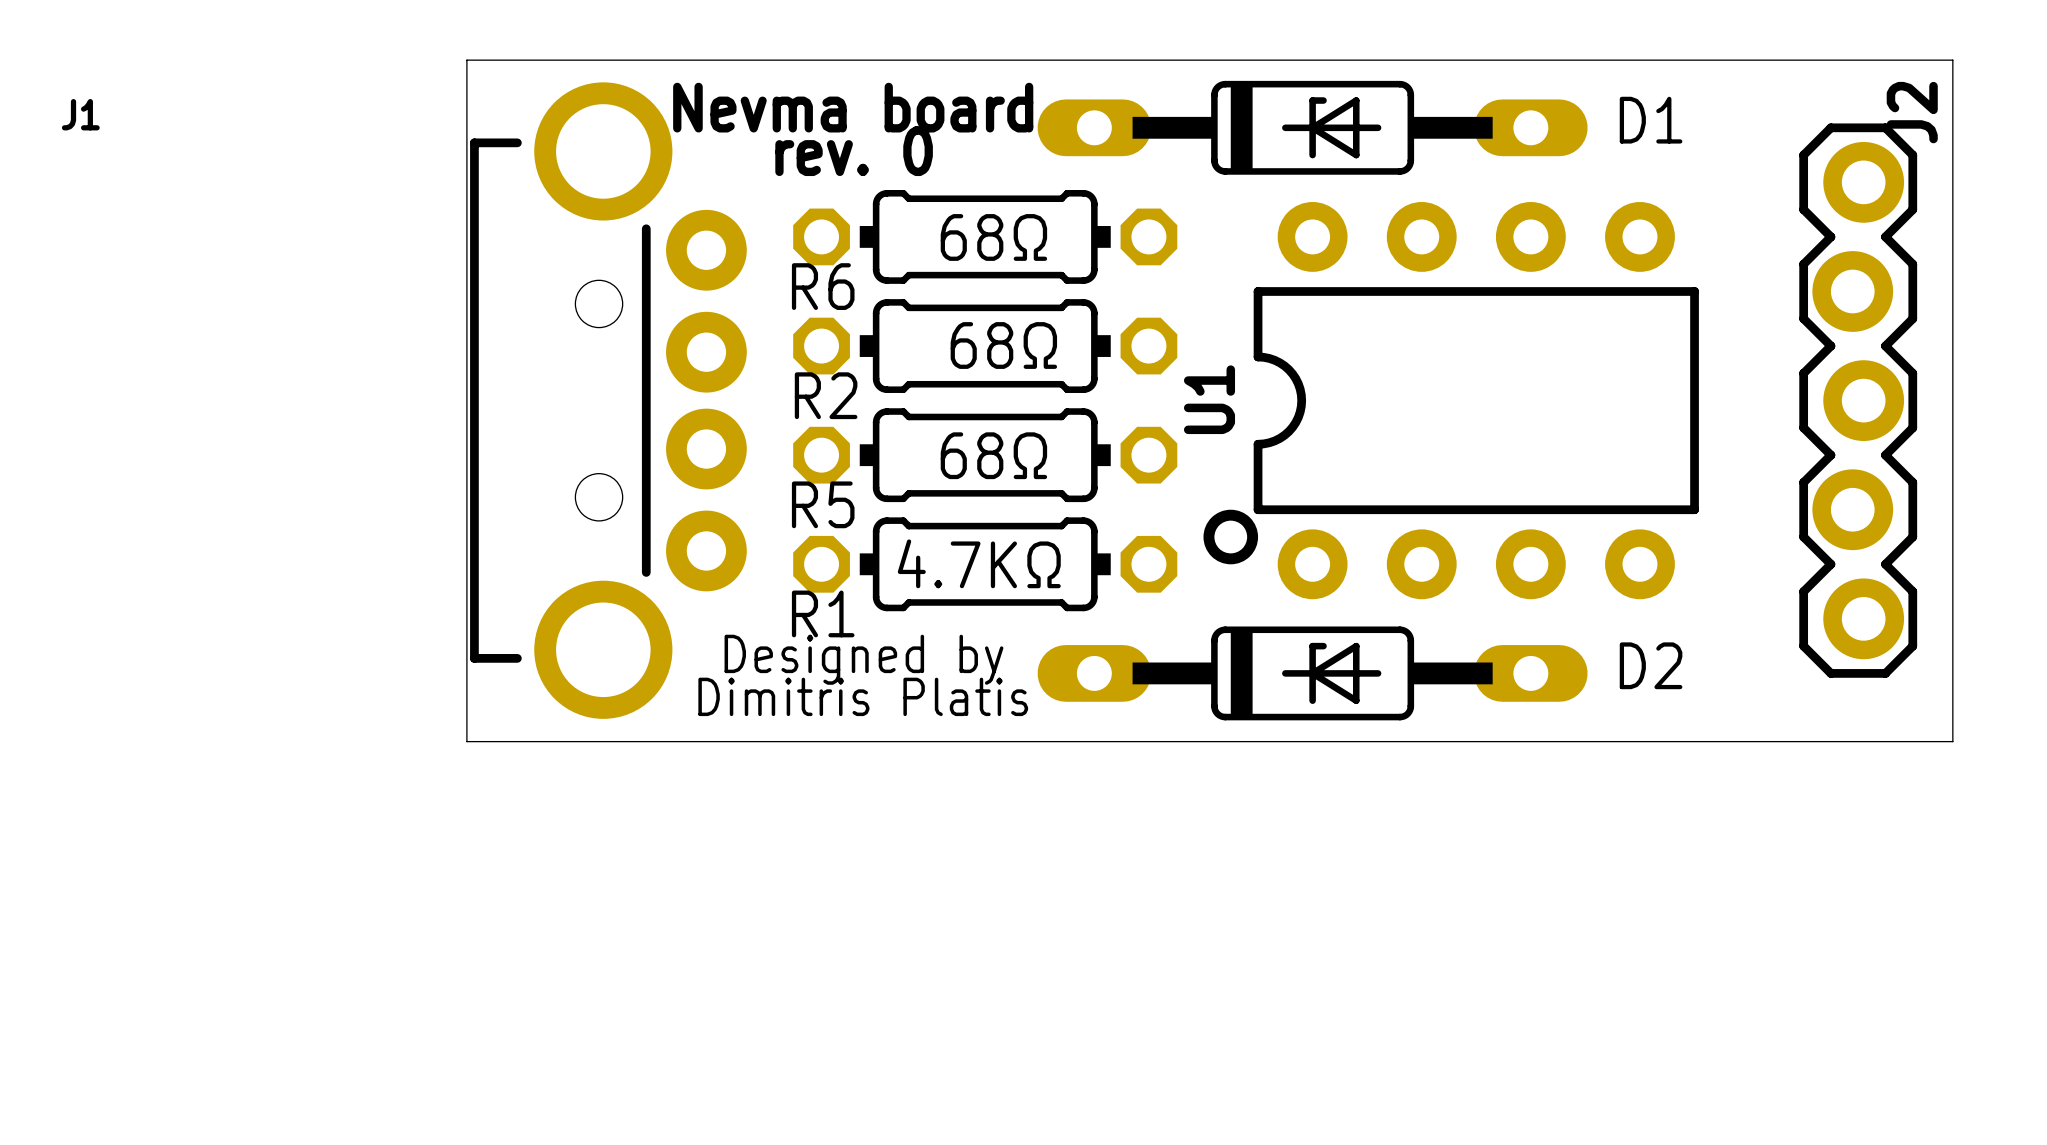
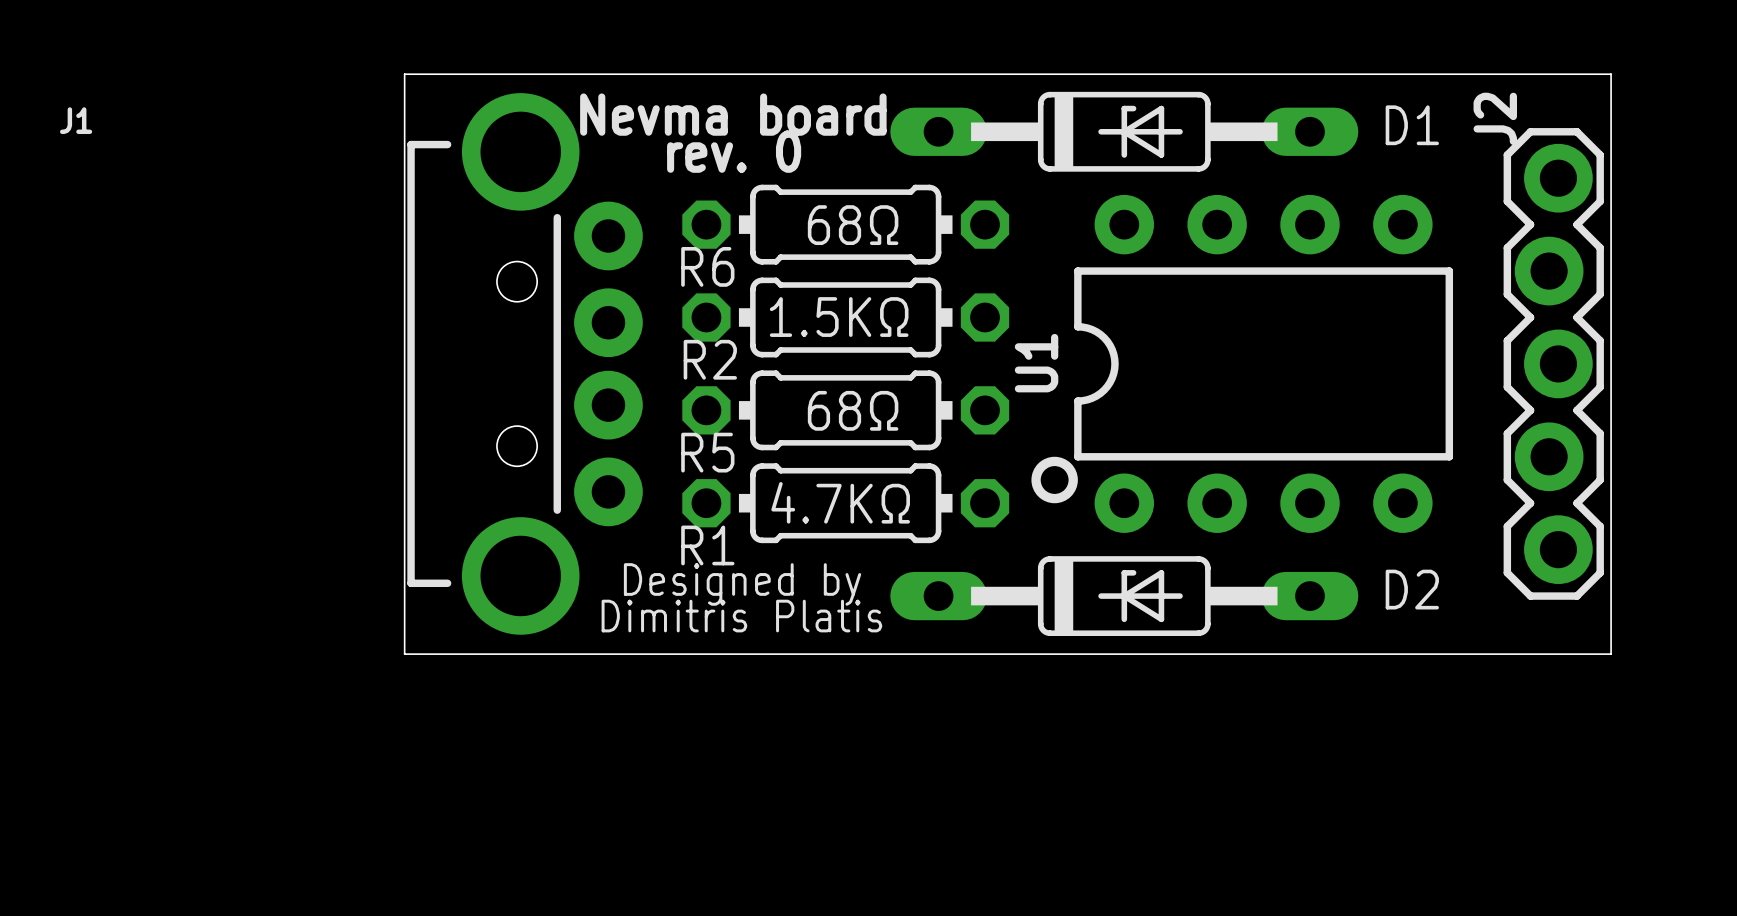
board edge: (1884, 60) (1952, 60) (1952, 741) (1884, 741) -> (1611, 74) (1611, 654)
J2 name position: J2 (1912, 112) -> J2 (1495, 118)
R2 value: 68Ω (1003, 345) -> 1.5KΩ (839, 317)
J2 position: (1858, 400) -> (1553, 363)

